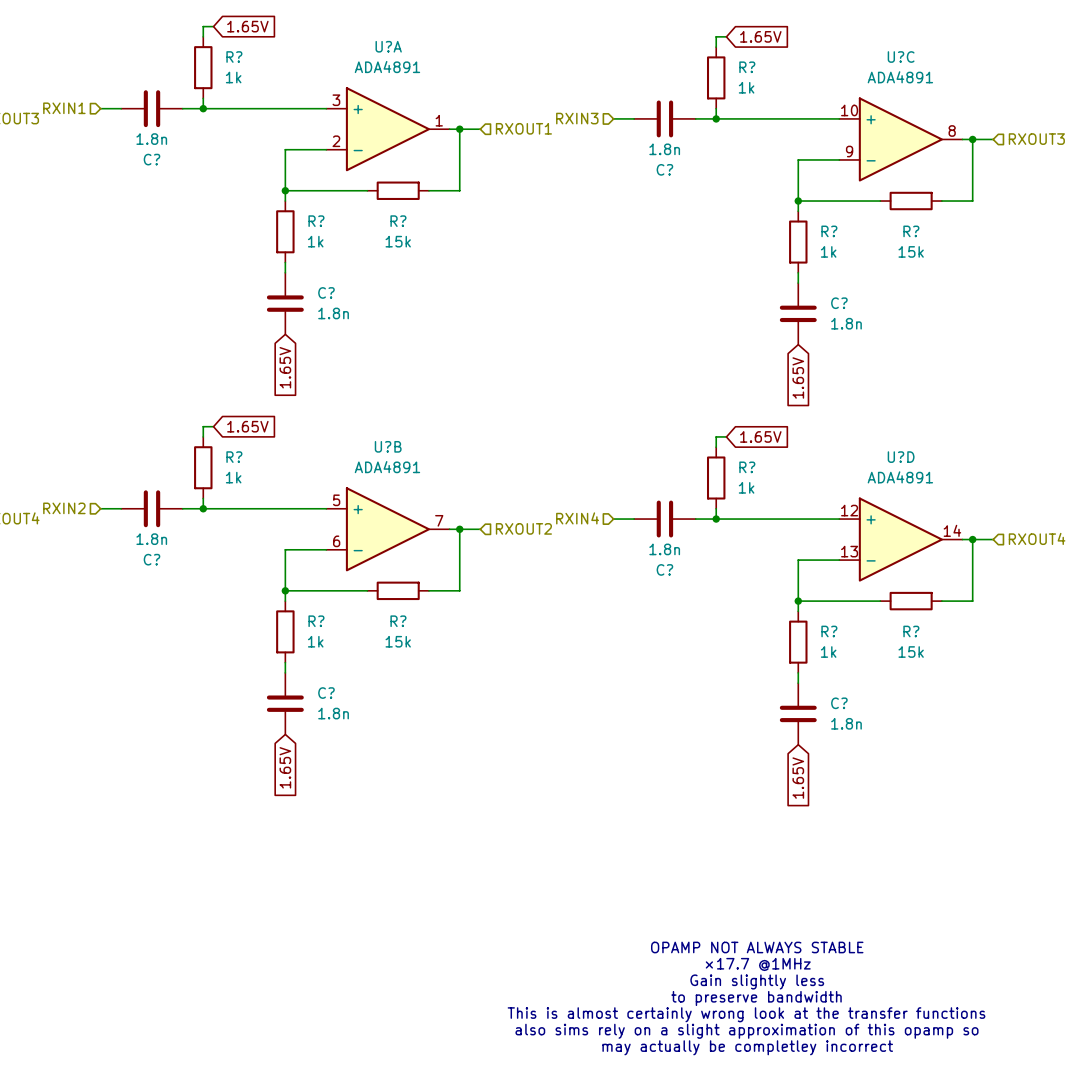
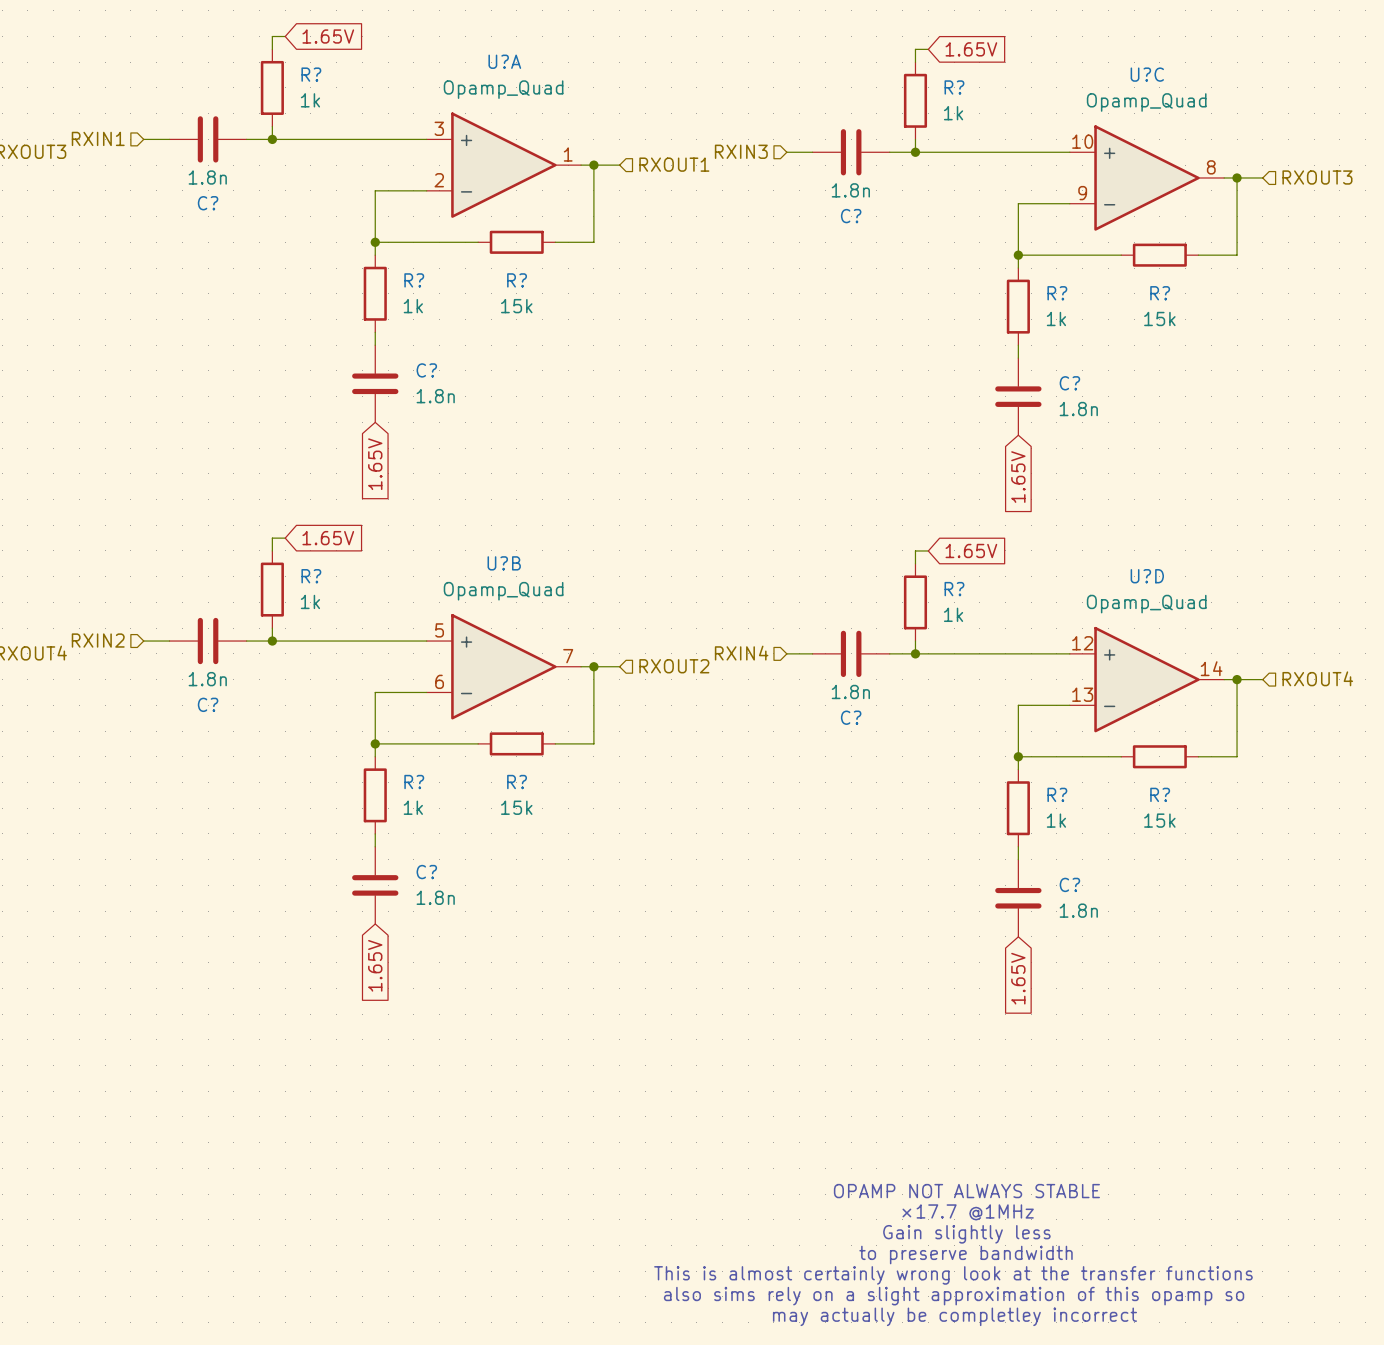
U?A value: ADA4891 (387, 67) -> Opamp_Quad (503, 89)
U?C value: ADA4891 (900, 77) -> Opamp_Quad (1146, 102)
U?B value: ADA4891 (387, 467) -> Opamp_Quad (503, 591)
U?D value: ADA4891 (900, 477) -> Opamp_Quad (1146, 604)

